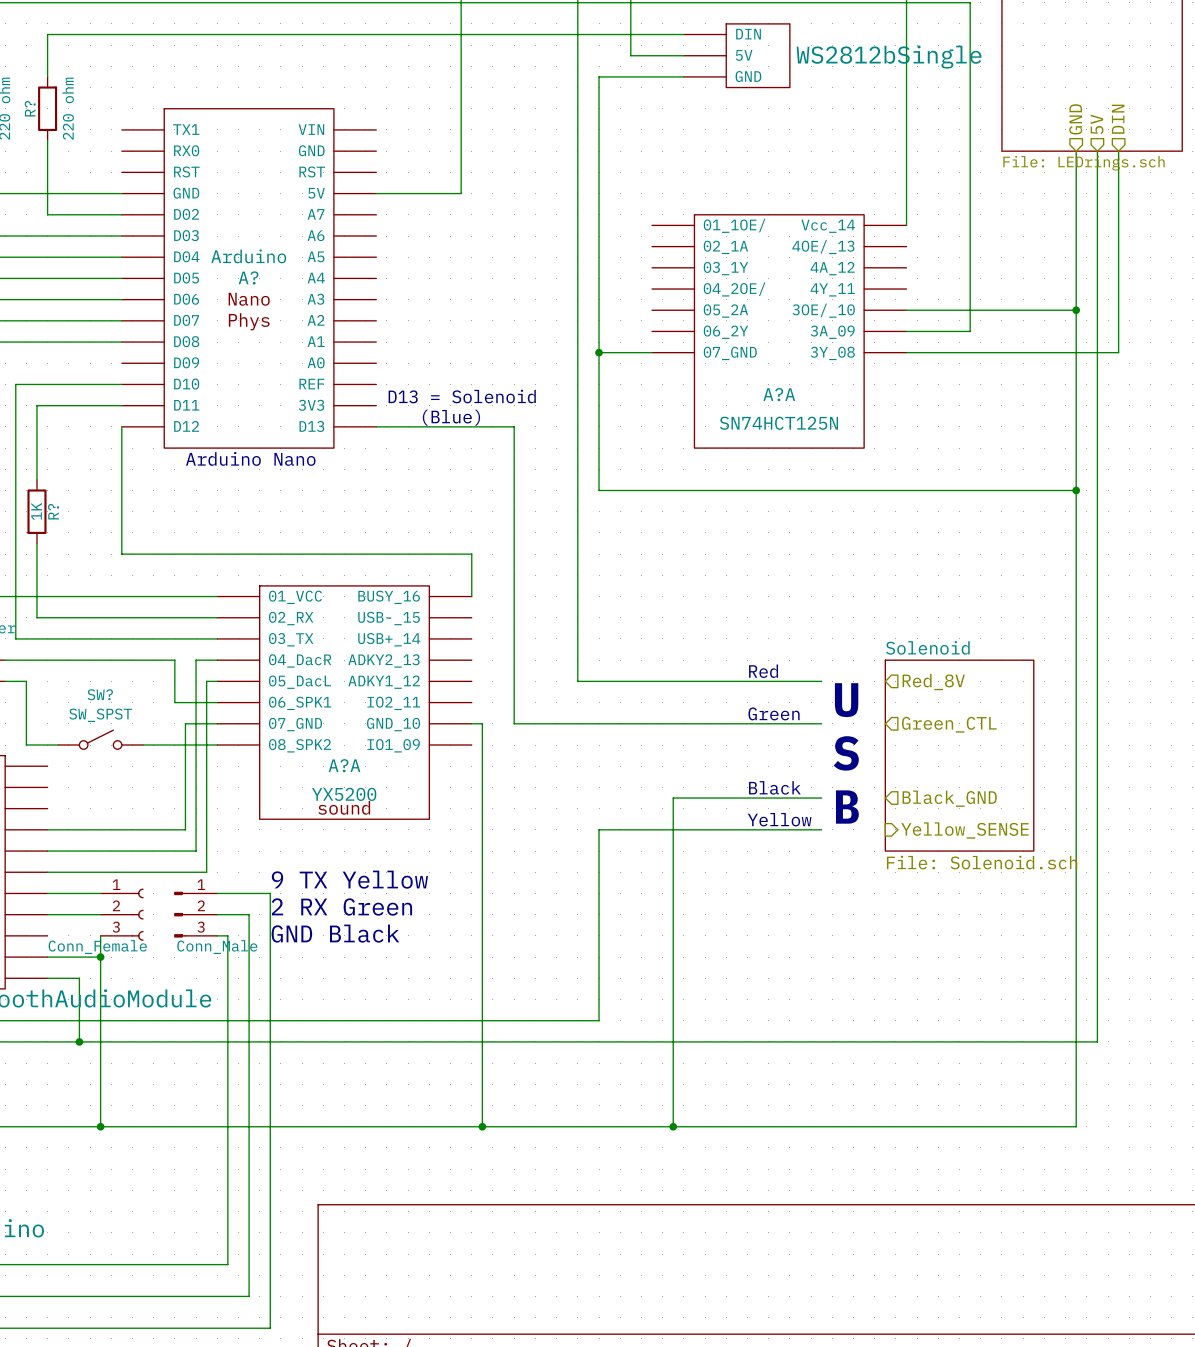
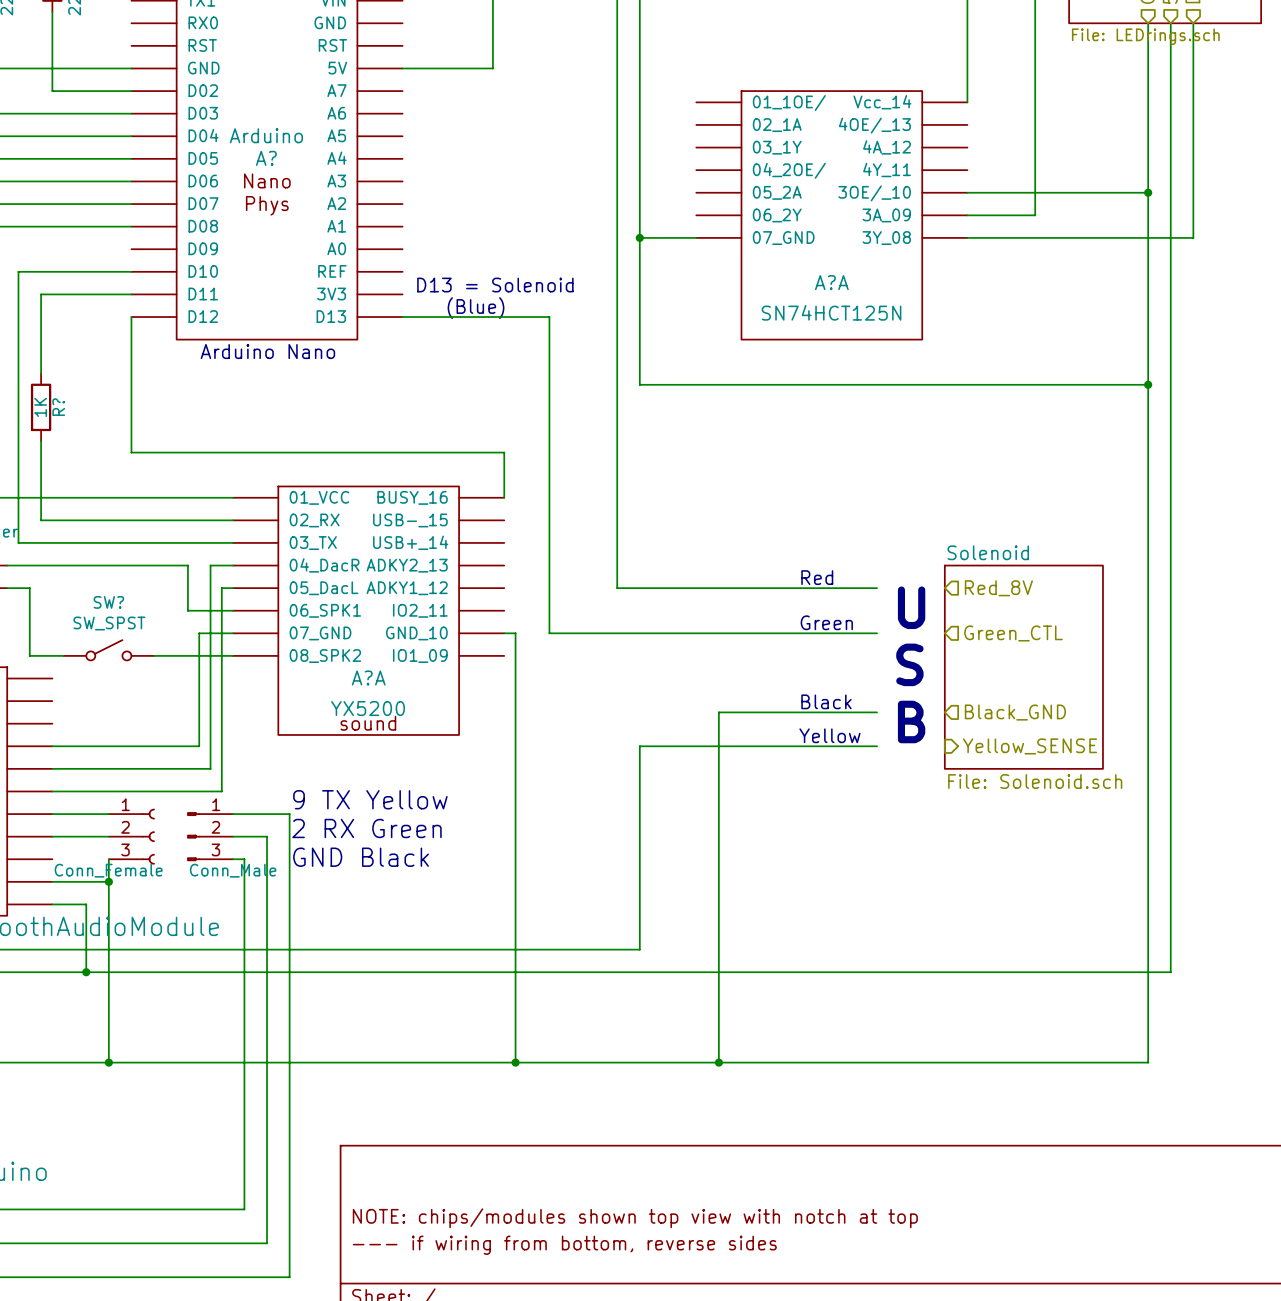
title block: none -> NOTE: chips/modules shown top view with notch at top (635, 1218)
title block: none -> --- if wiring from bottom, reverse sides (564, 1245)

